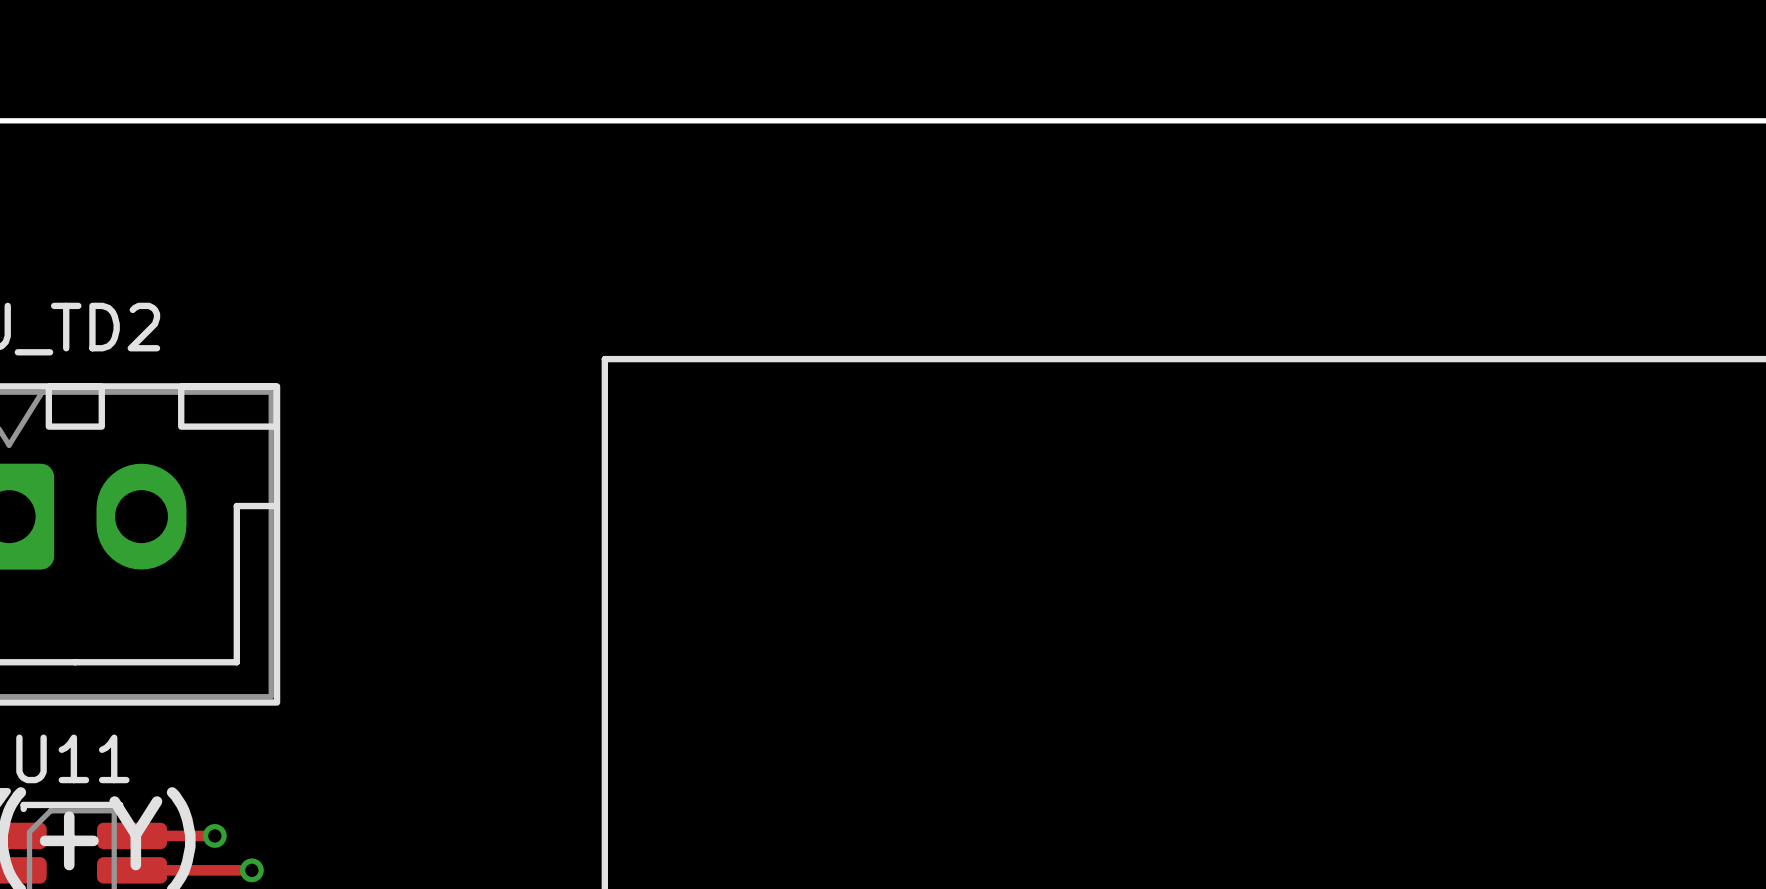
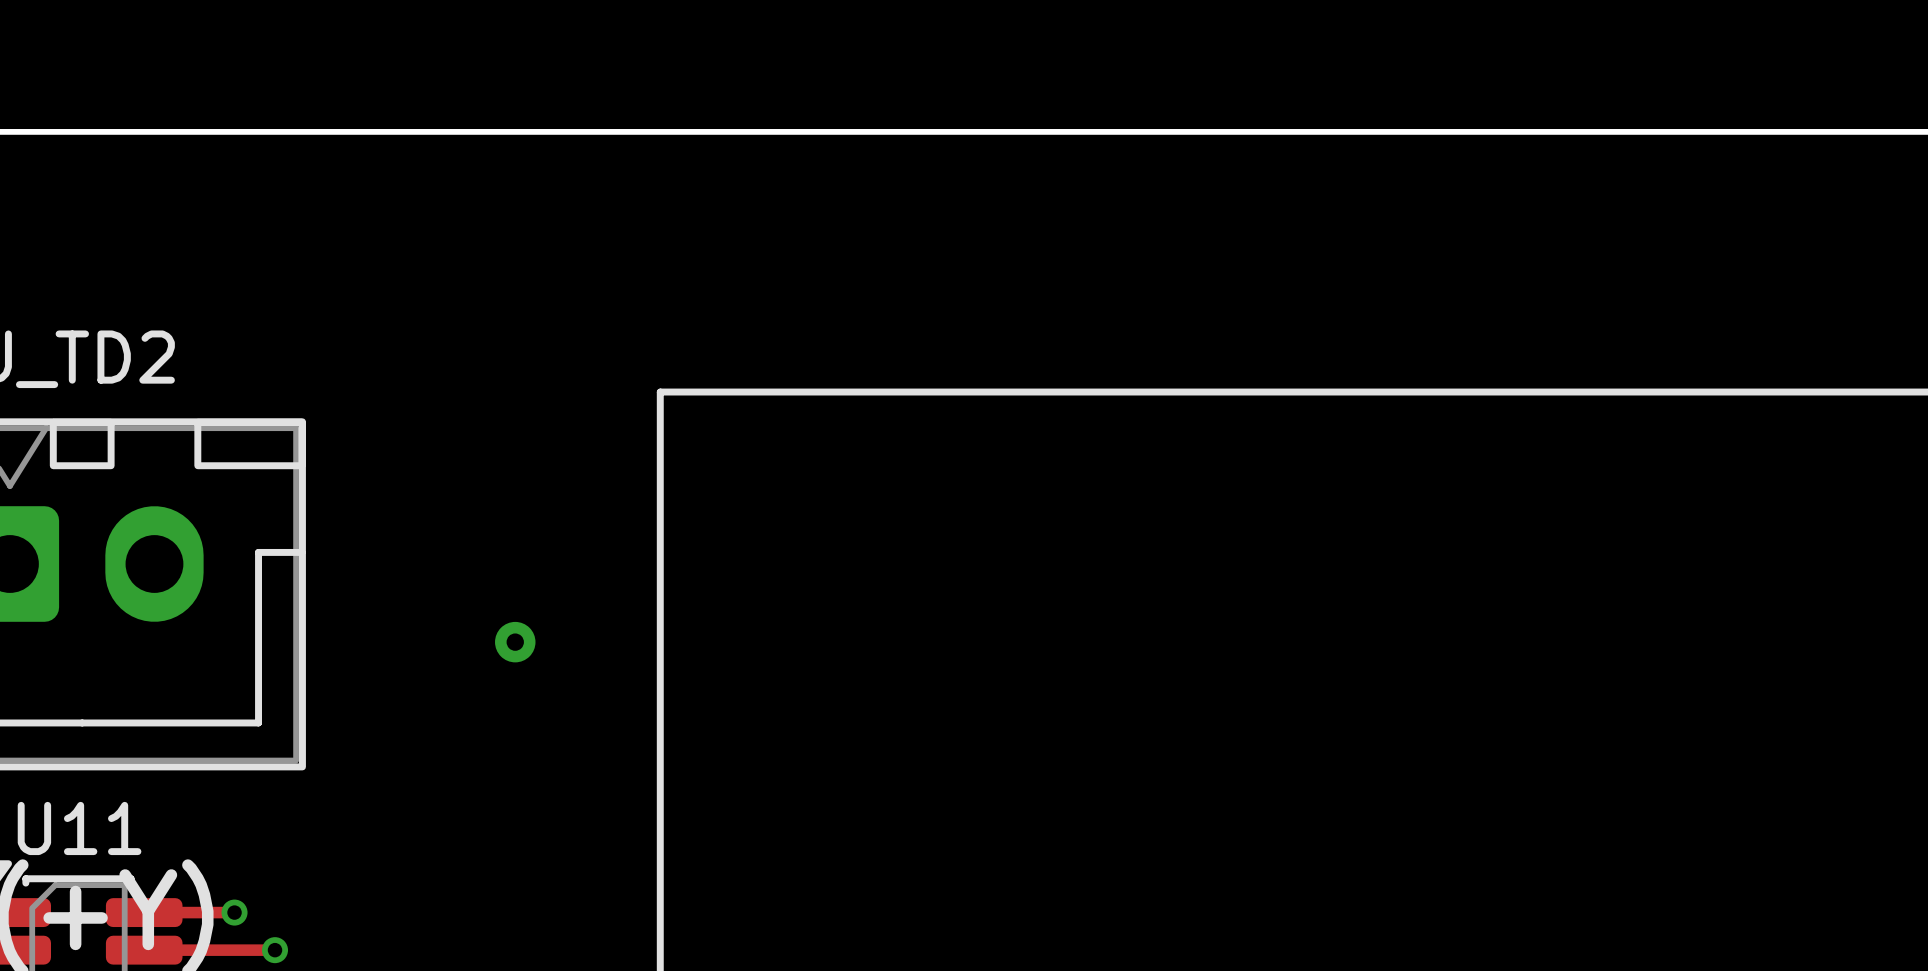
via: none -> (515, 642)

